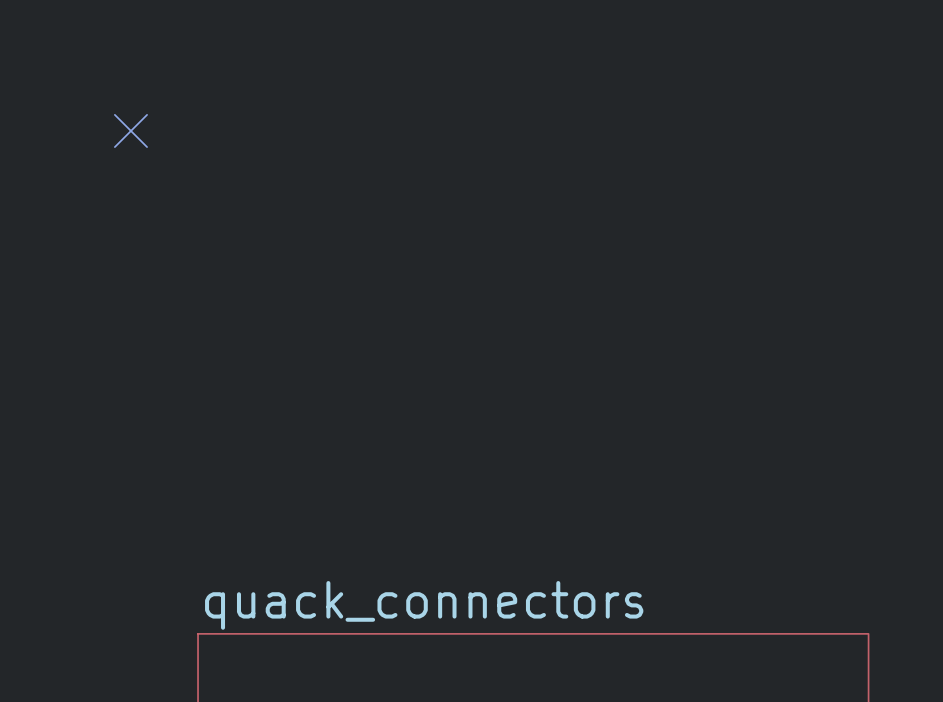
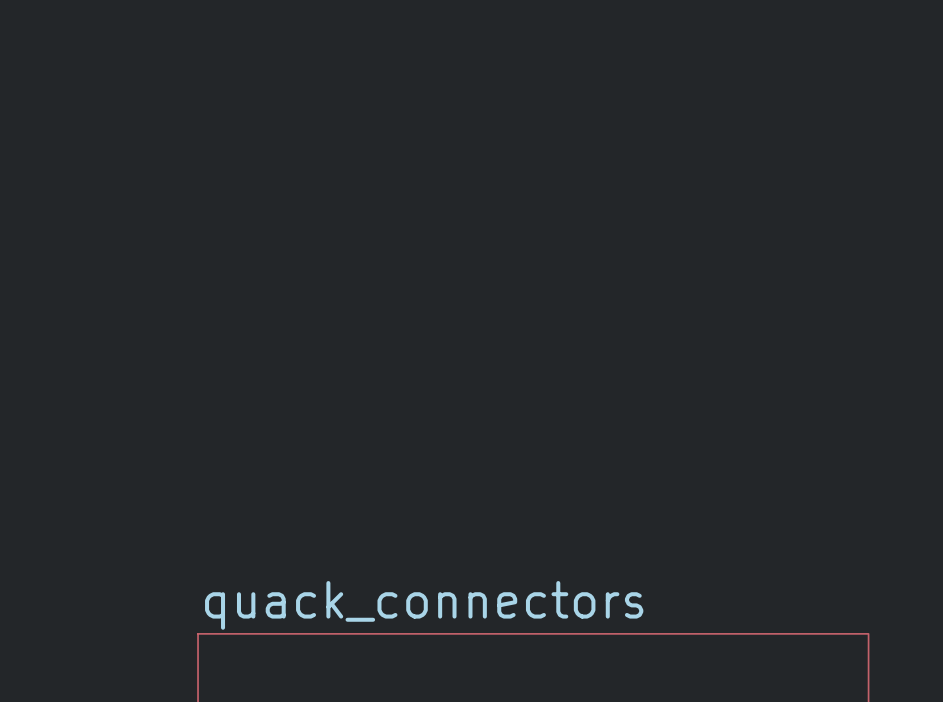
no-connect mark: (130, 130) -> none

